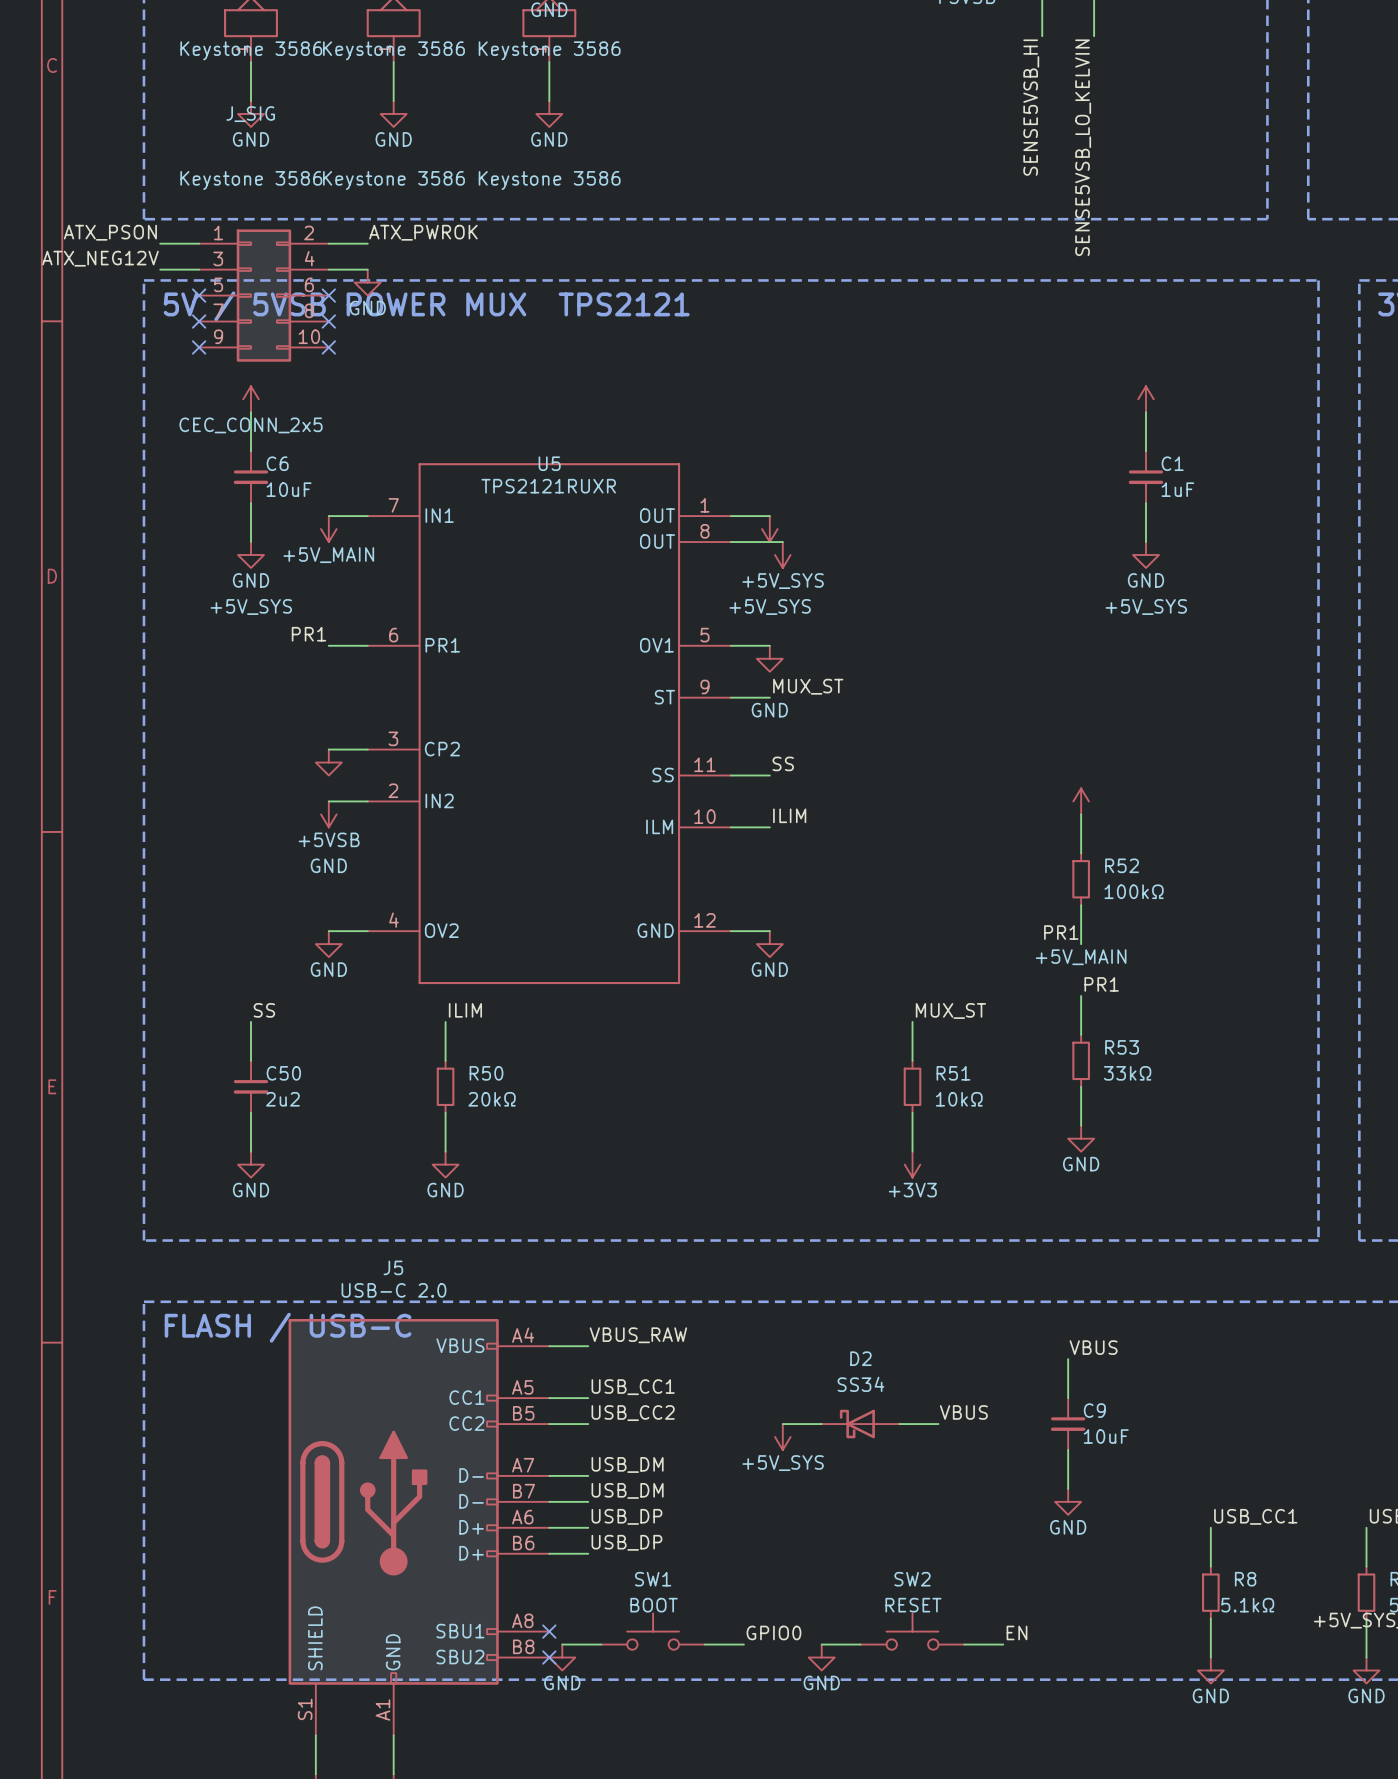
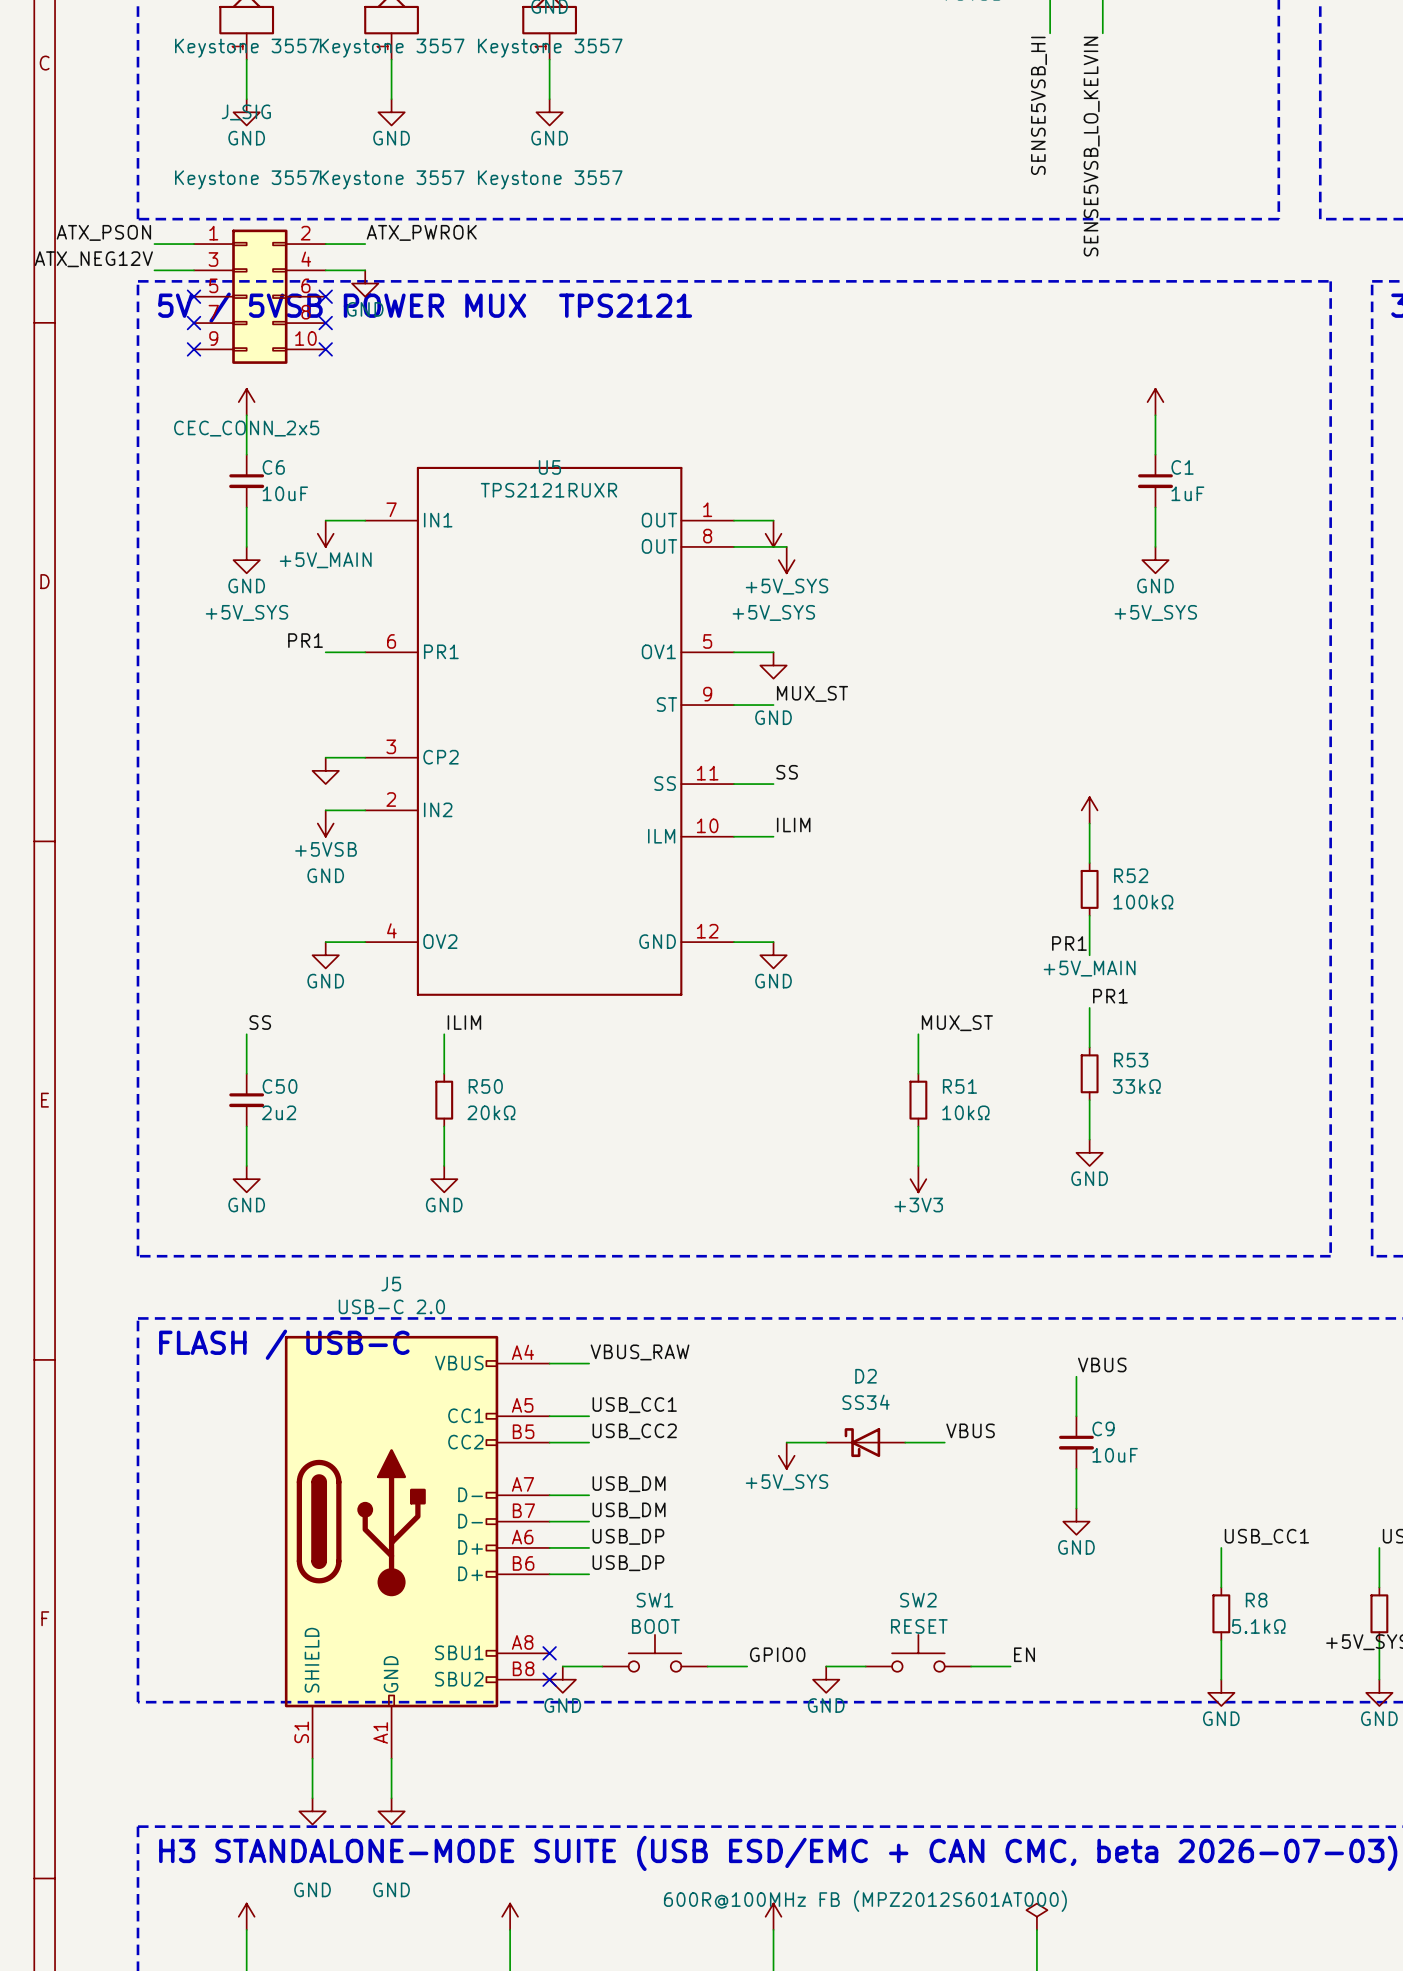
part value: Keystone 3586 (251, 50) -> Keystone 3557 (247, 48)
part value: Keystone 3586 (393, 50) -> Keystone 3557 (392, 48)
part value: Keystone 3586 (549, 50) -> Keystone 3557 (550, 48)
part value: Keystone 3586 (251, 180) -> Keystone 3557 (247, 179)
part value: Keystone 3586 (393, 180) -> Keystone 3557 (392, 179)
part value: Keystone 3586 (549, 180) -> Keystone 3557 (550, 179)

